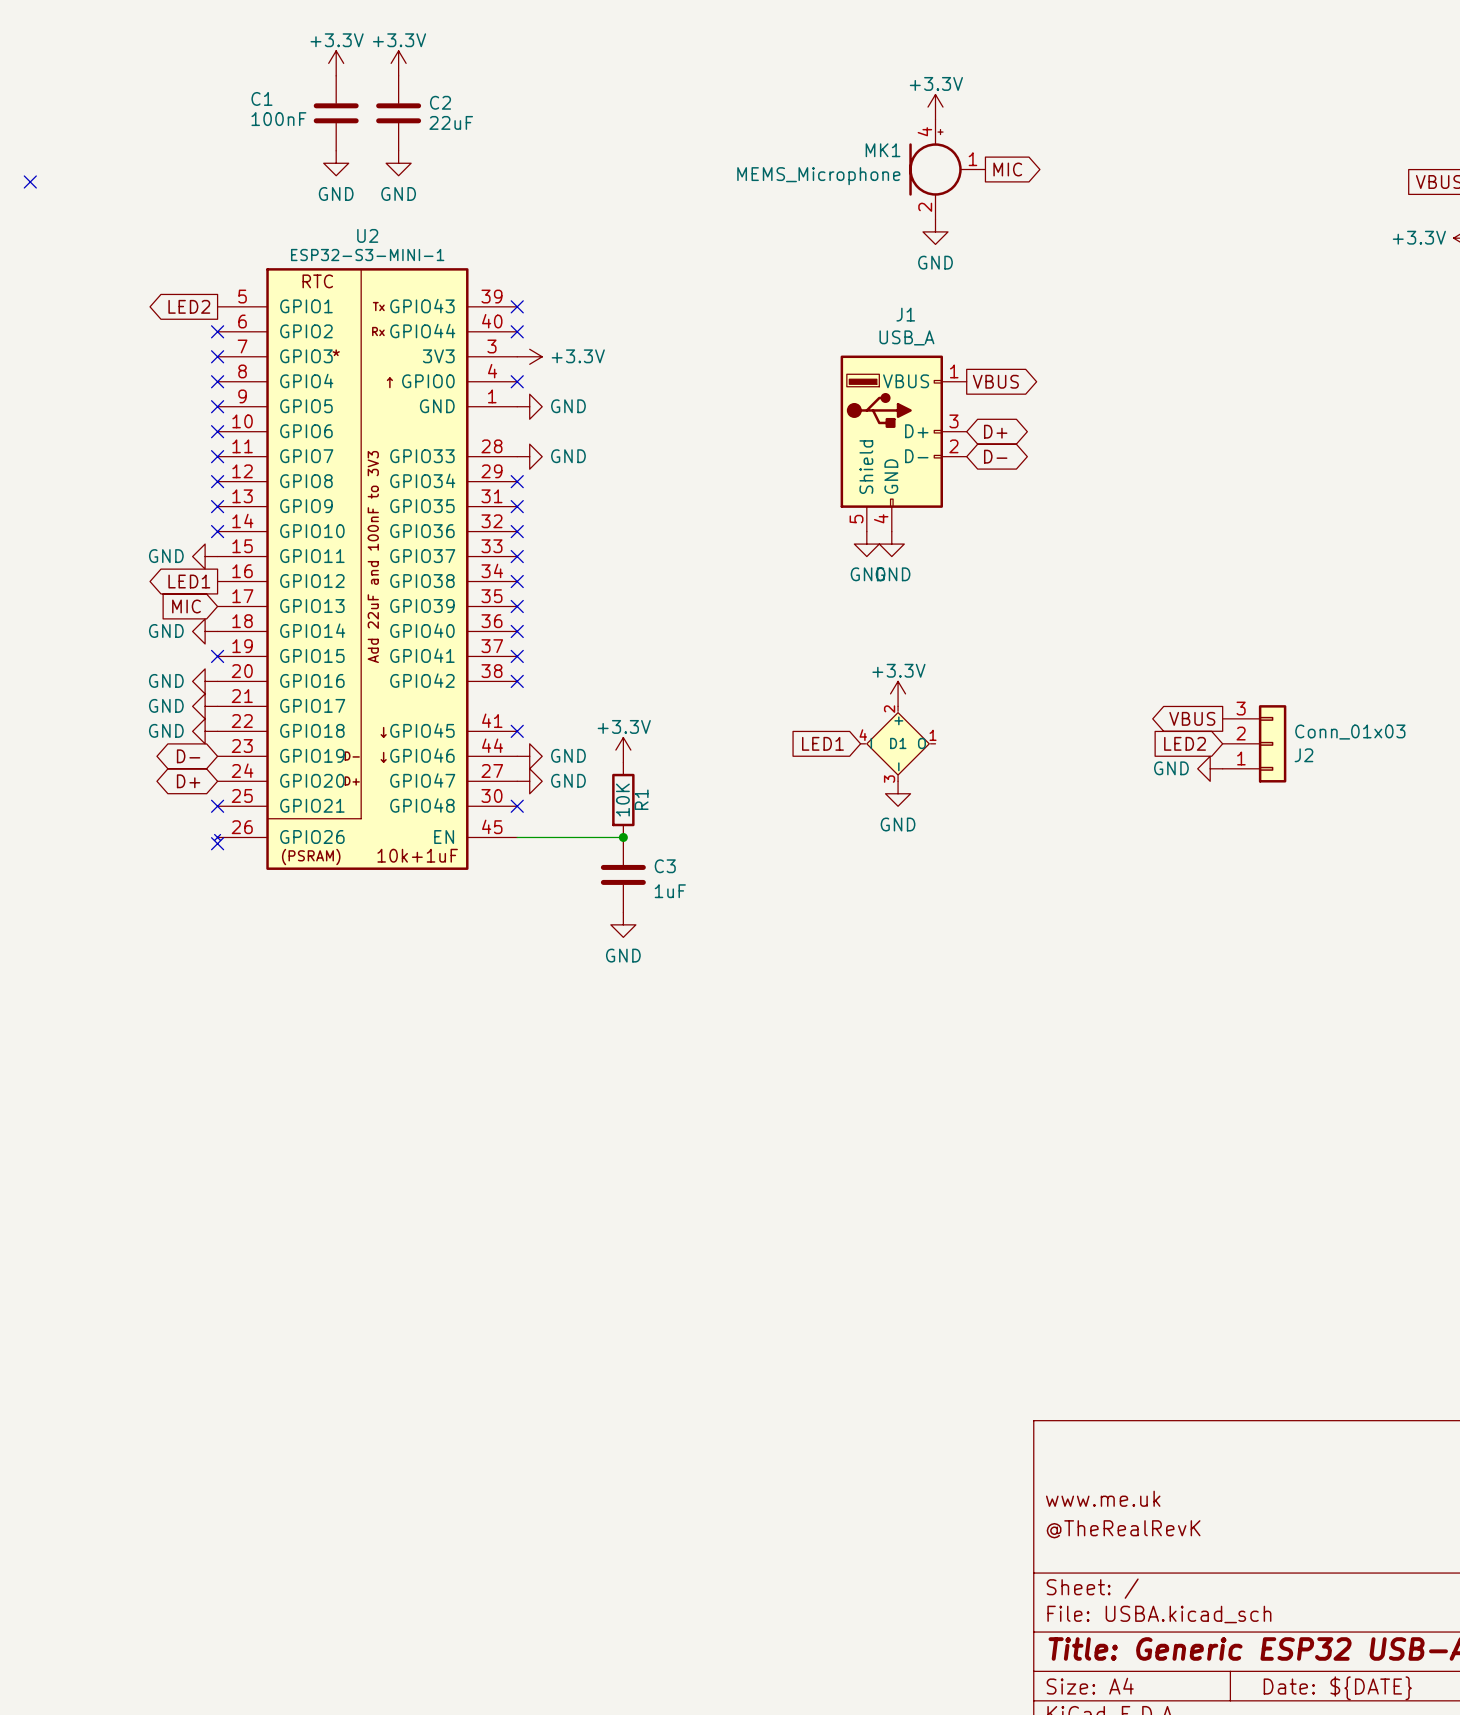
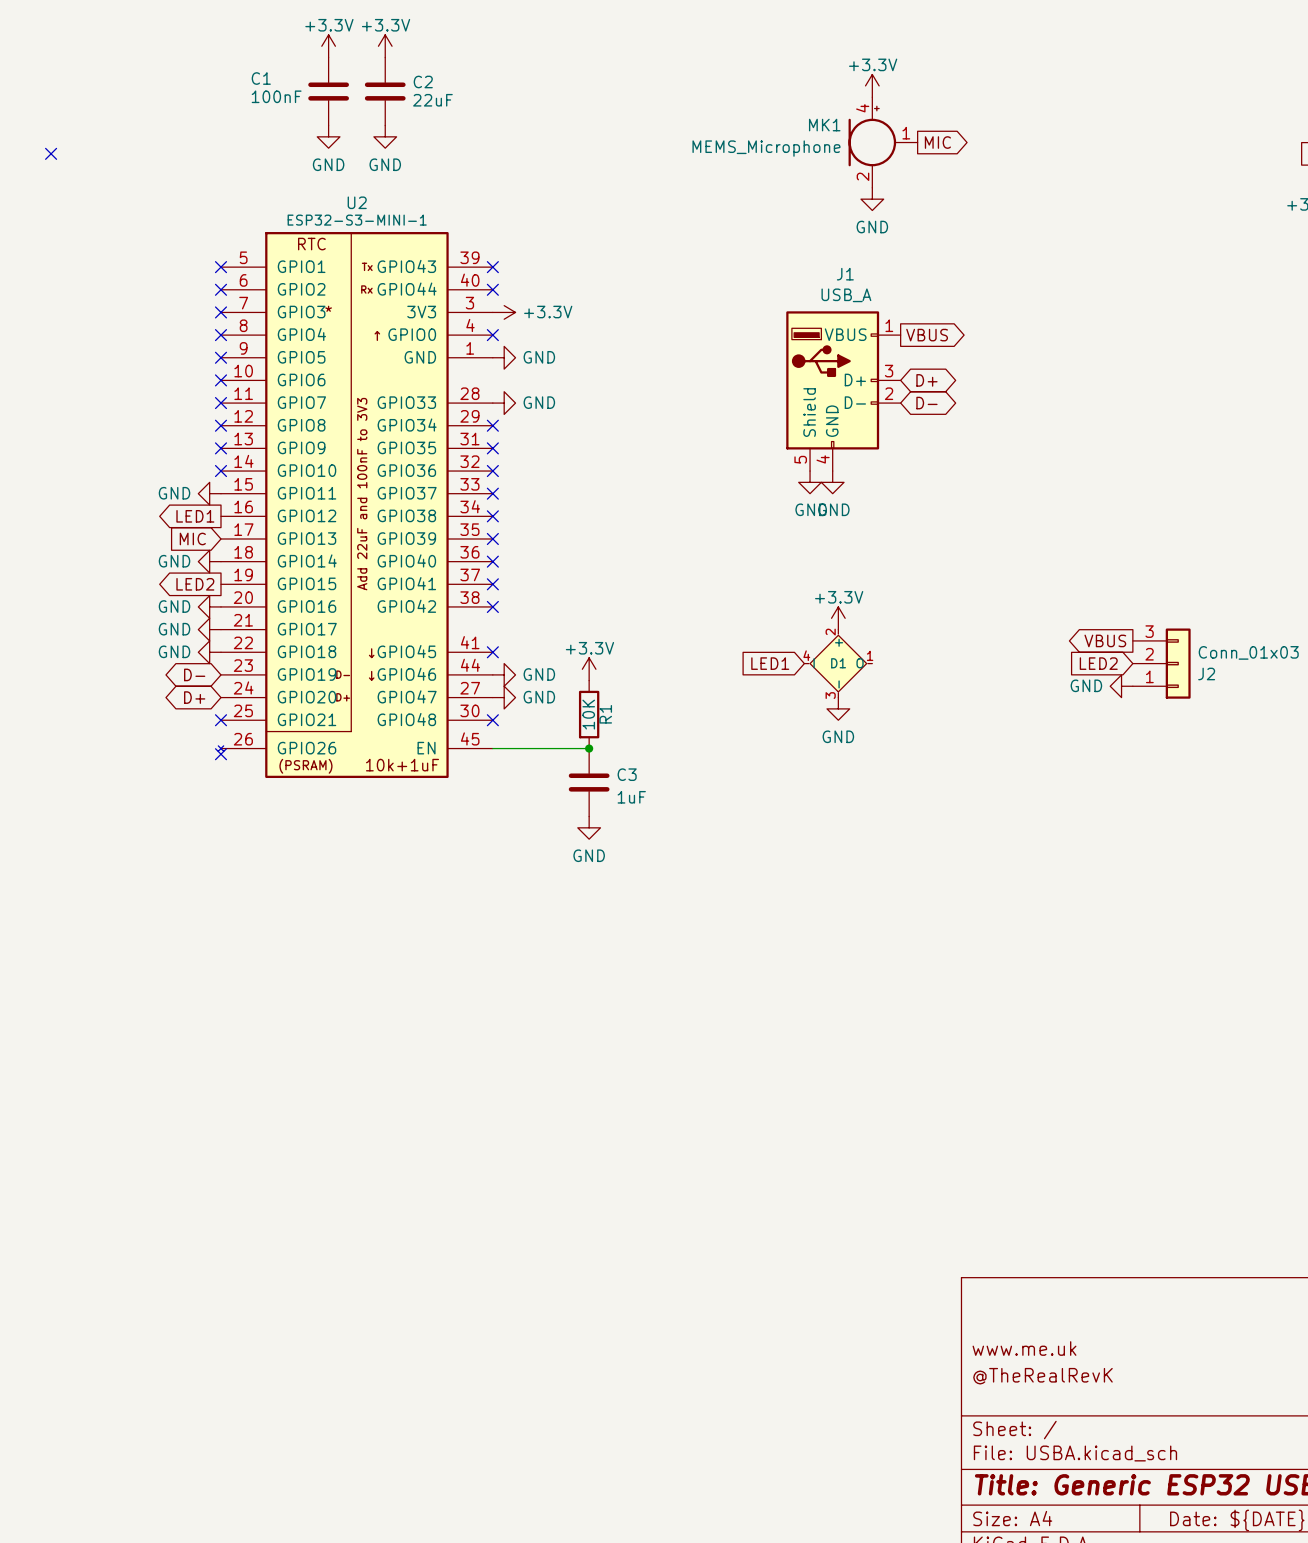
global label: LED2 (189, 306) -> none
no-connect mark: none -> (220, 267)
global label: none -> LED2 (195, 584)
no-connect mark: (217, 656) -> none

